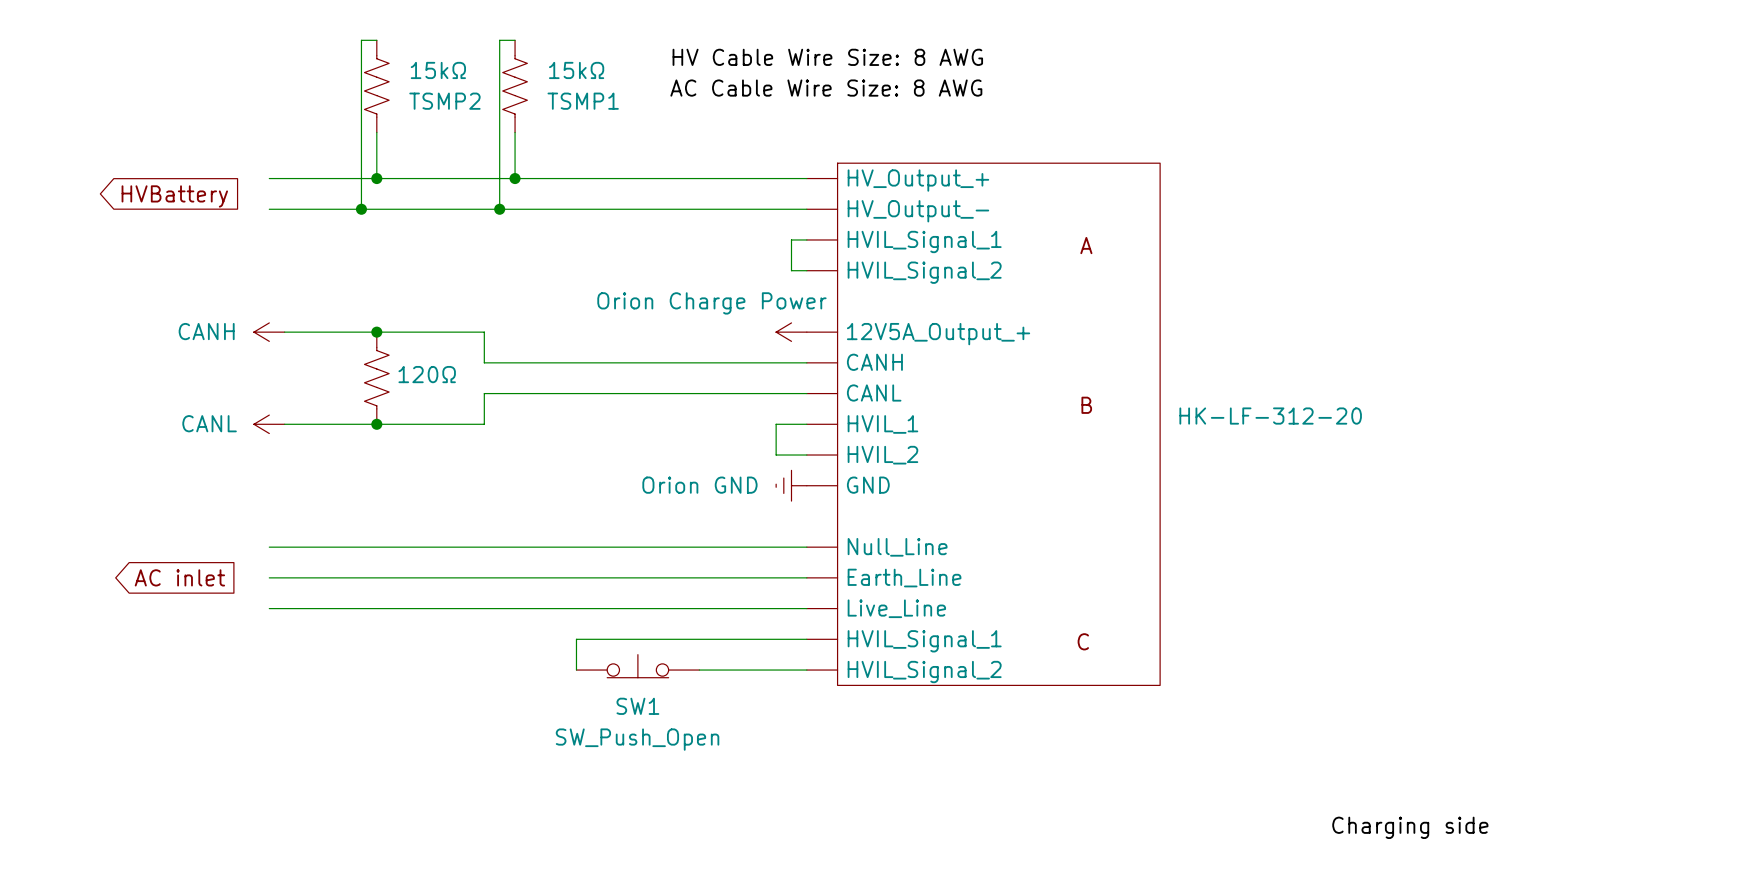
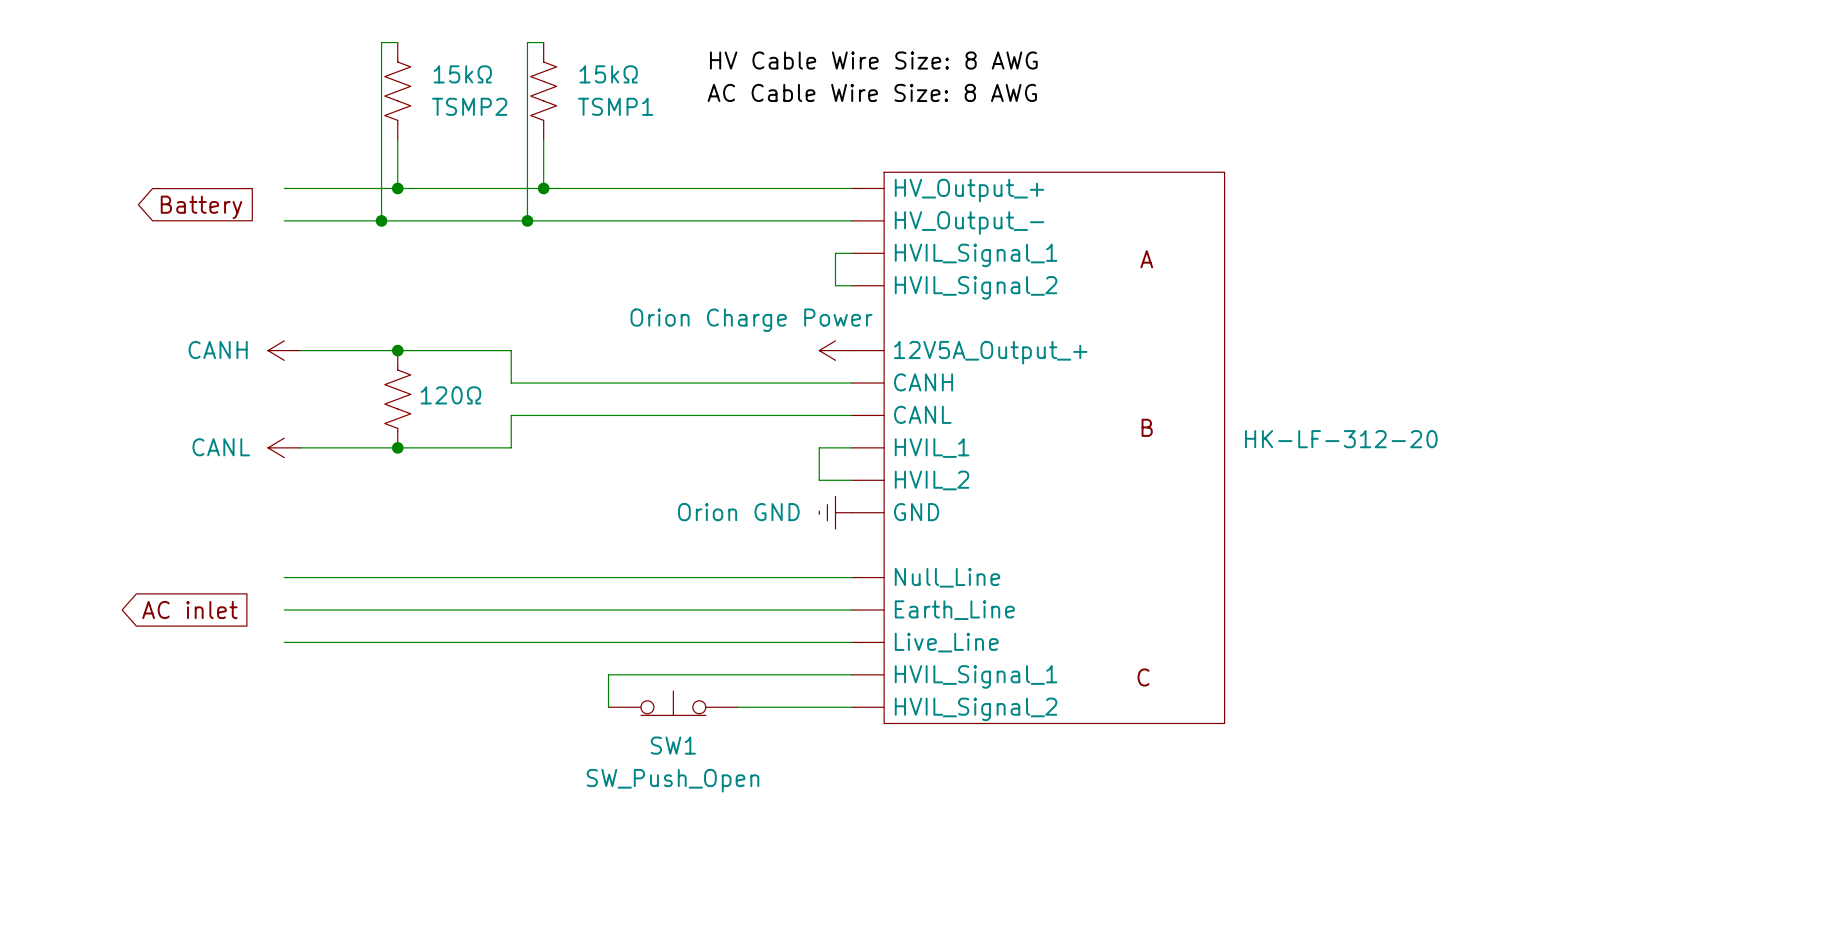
global label: HVBattery (174, 196) -> Battery (201, 207)
label: Charging side (1410, 827) -> none

